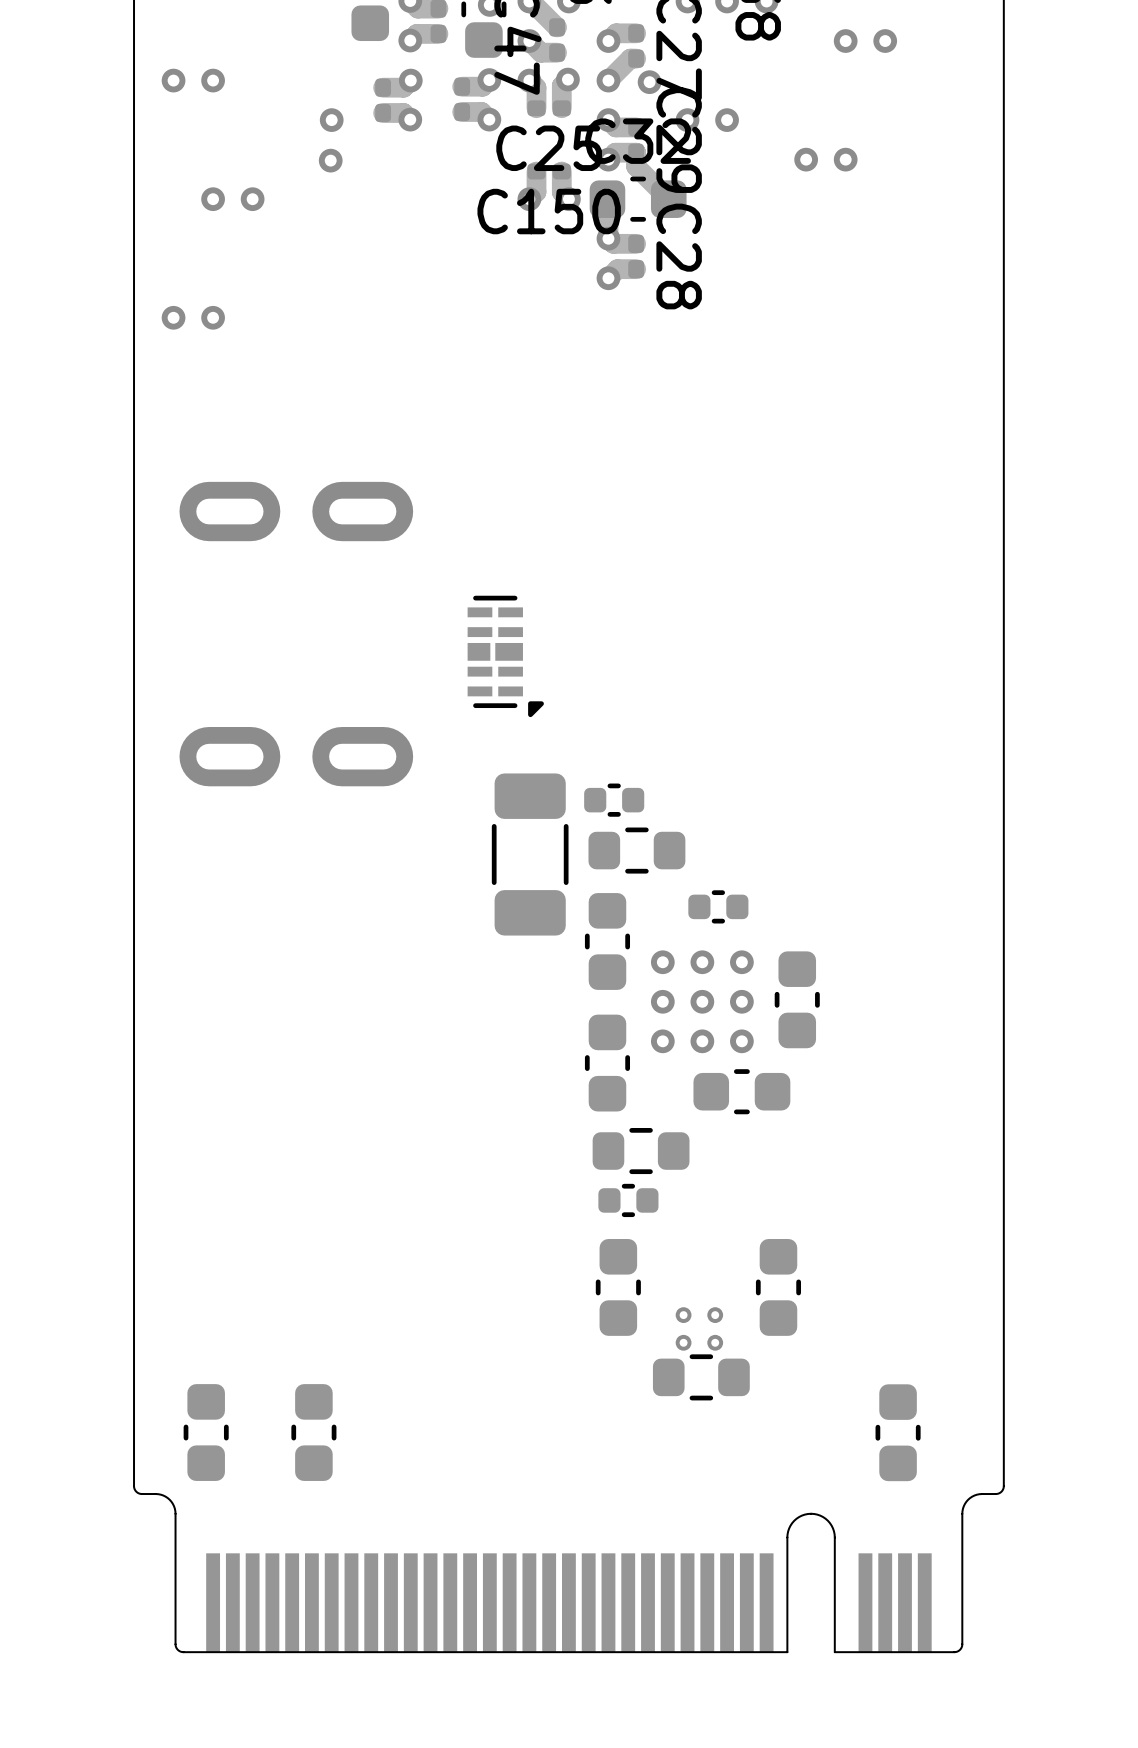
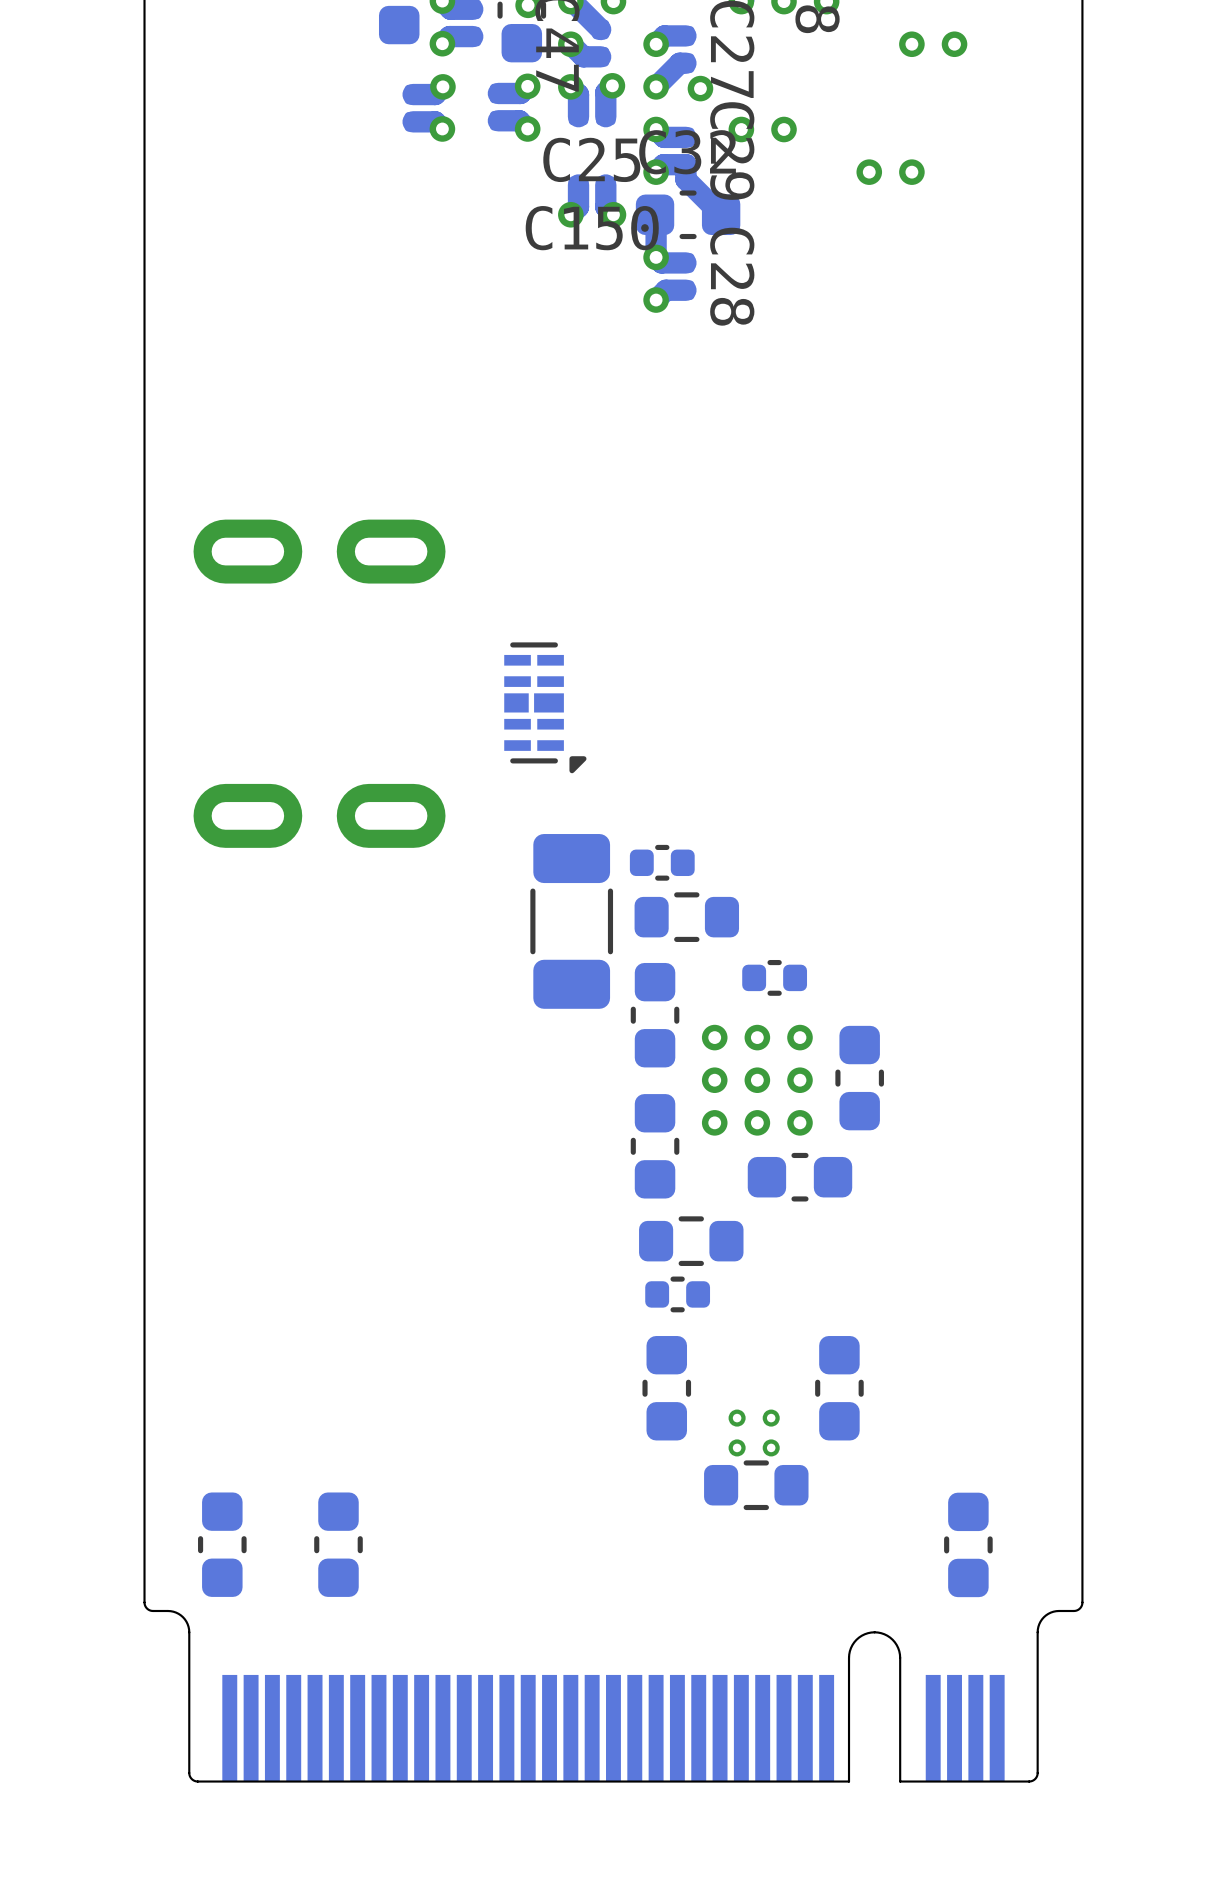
via: (173, 80) -> none
via: (213, 80) -> none
via: (331, 120) -> none
via: (330, 160) -> none
via: (213, 199) -> none
via: (252, 199) -> none
via: (173, 317) -> none
via: (213, 317) -> none

